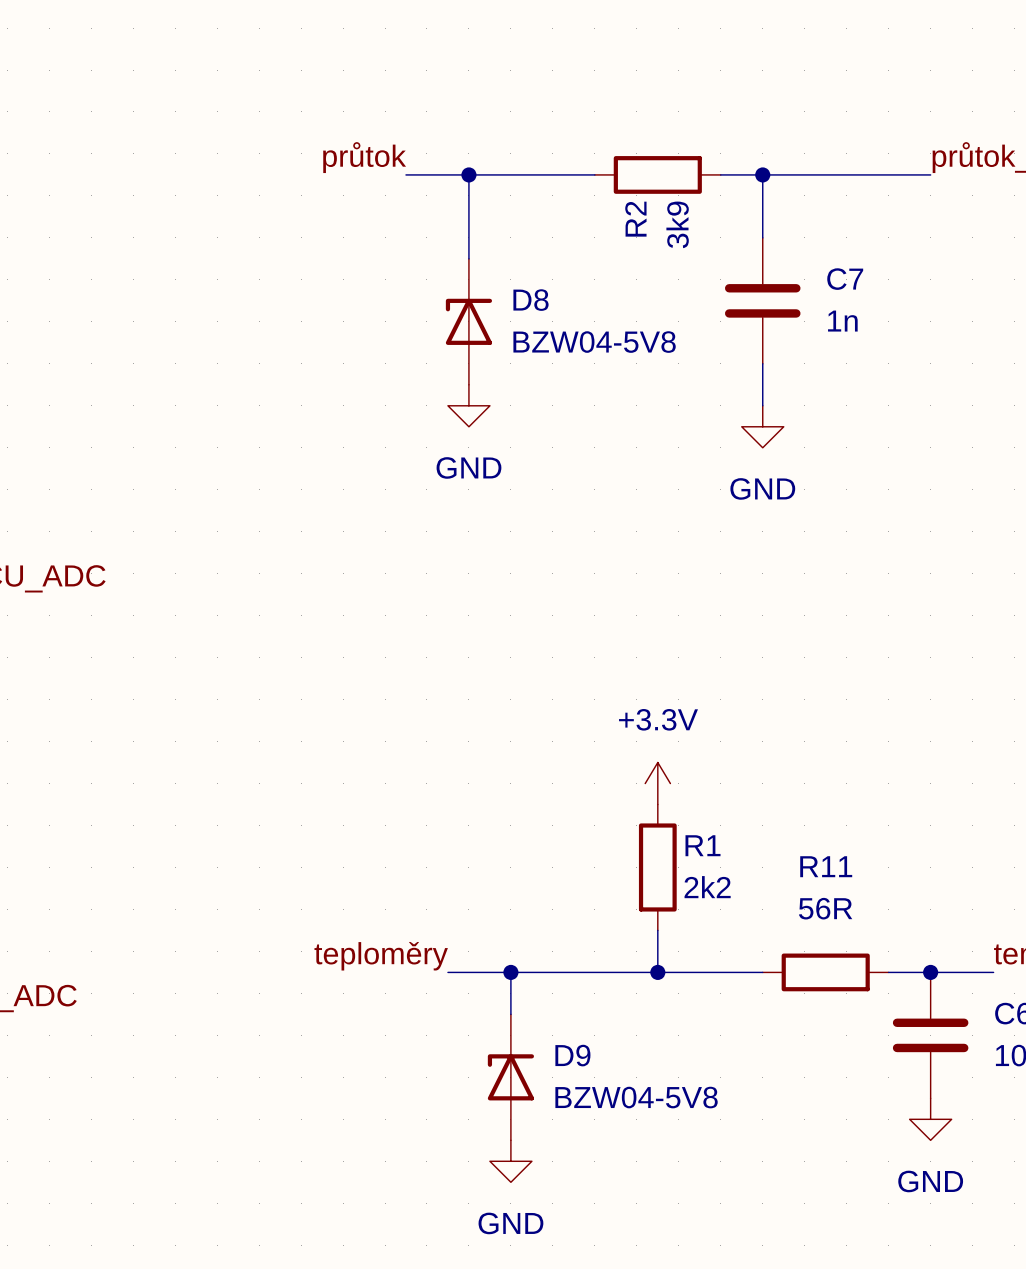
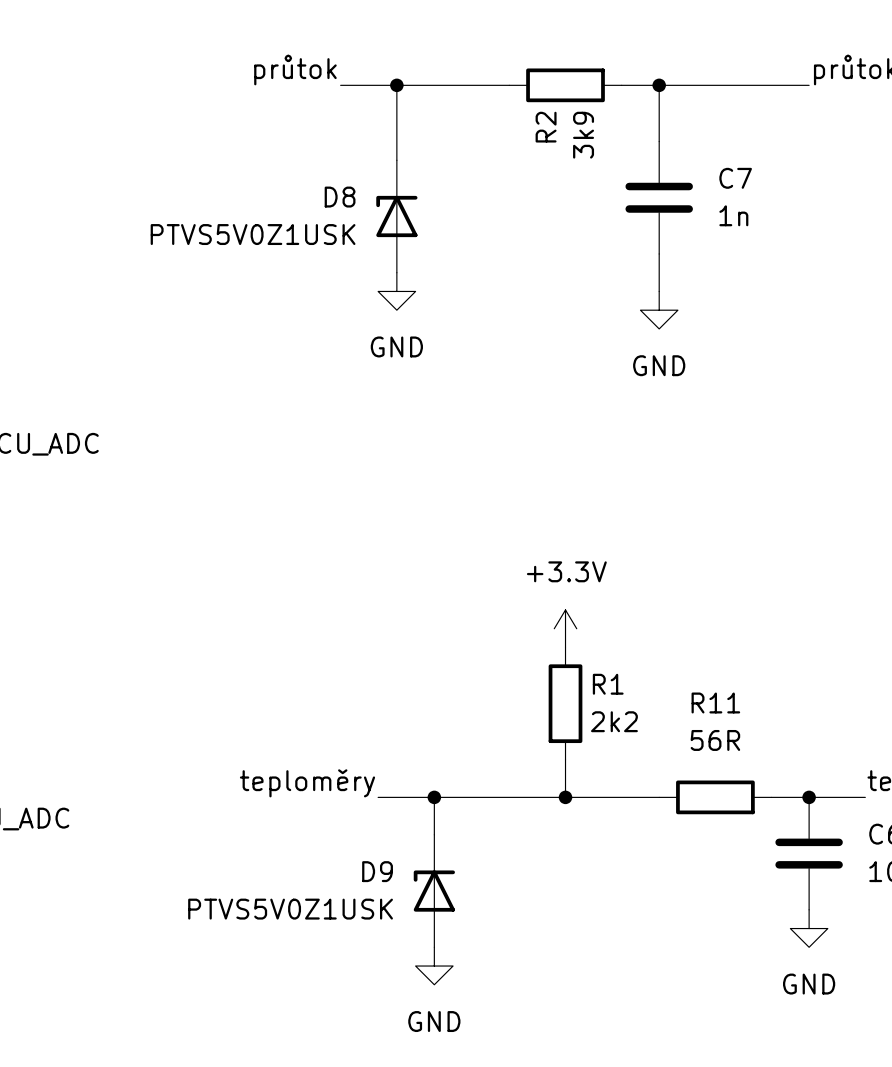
D8 name position: D8 (531, 300) -> D8 (340, 197)
D8 value: BZW04-5V8 (594, 342) -> PTVS5V0Z1USK (253, 234)
D9 name position: D9 (572, 1055) -> D9 (377, 871)
D9 value: BZW04-5V8 (636, 1097) -> PTVS5V0Z1USK (290, 909)

